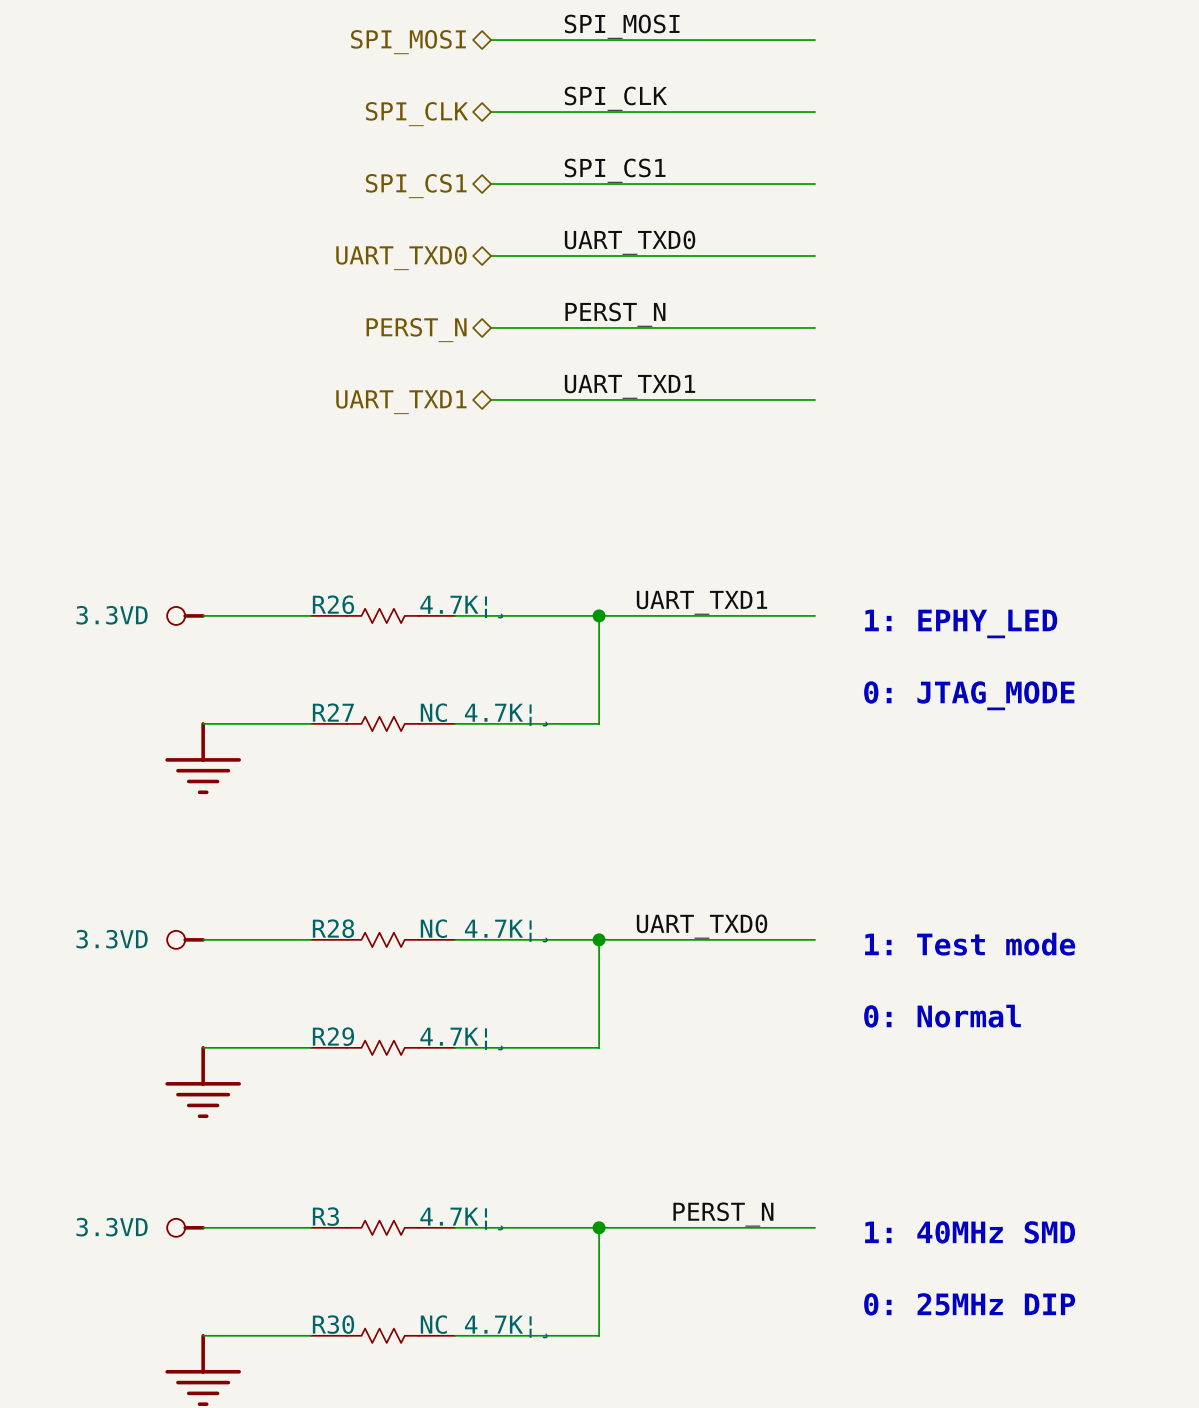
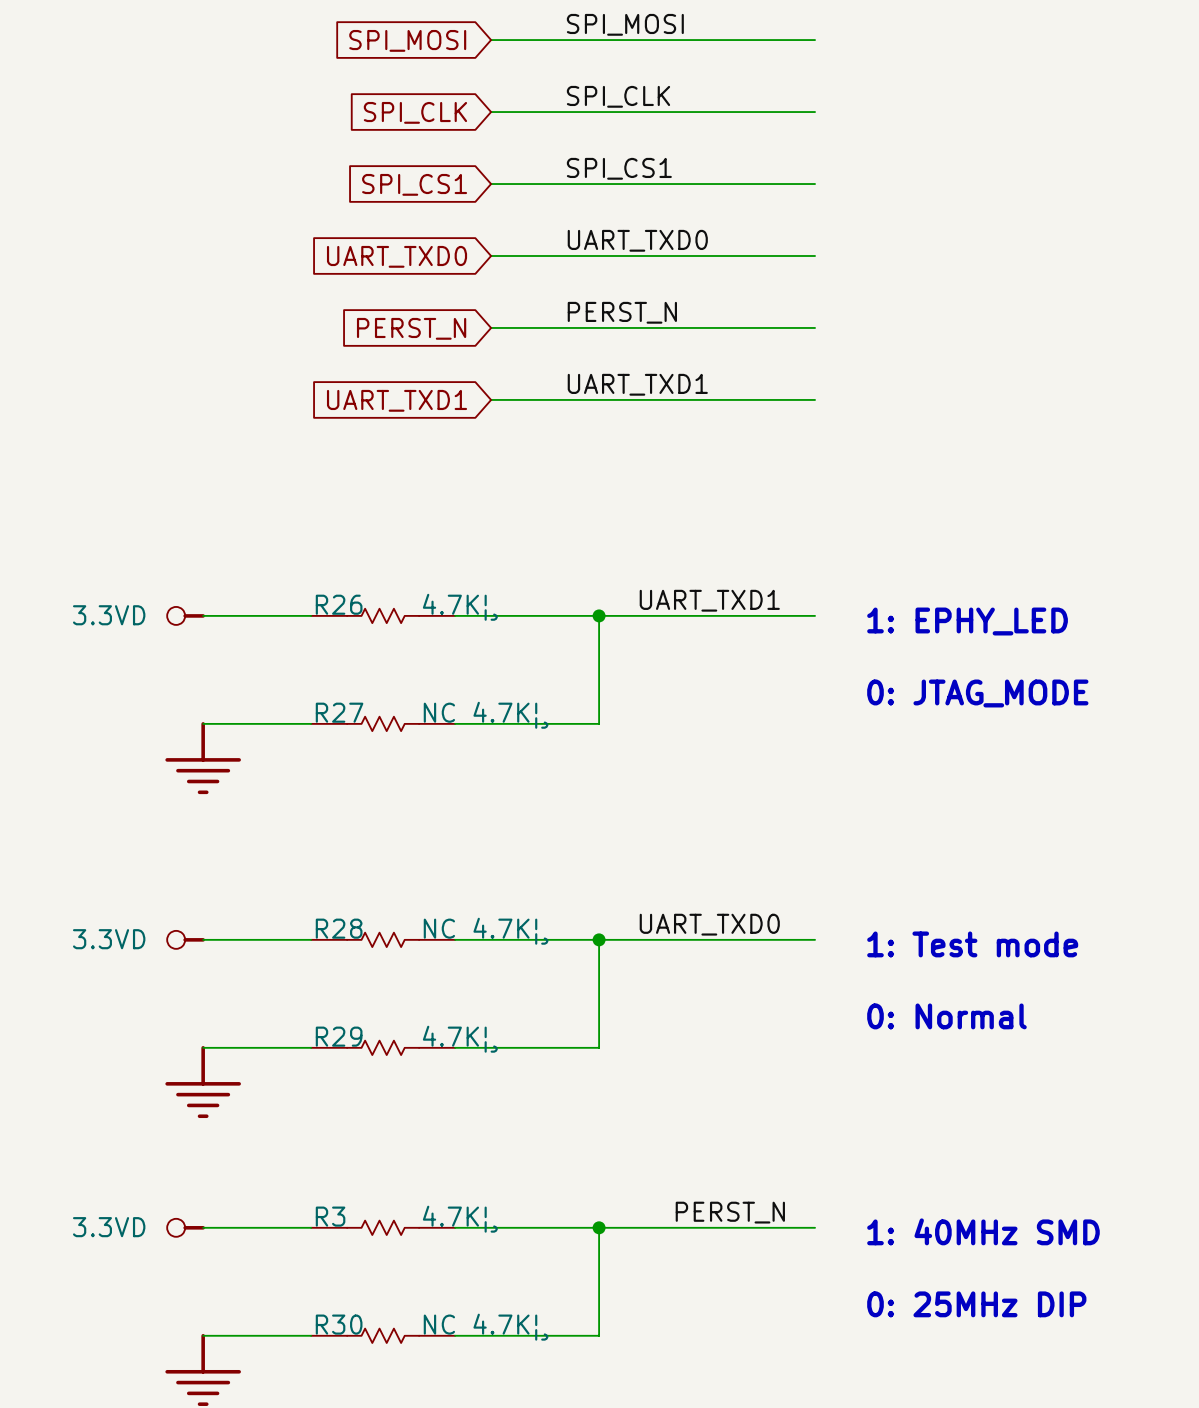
hierarchical label: SPI_MOSI (408, 42) -> none
global label: none -> SPI_MOSI (407, 40)
hierarchical label: SPI_CLK (417, 114) -> none
global label: none -> SPI_CLK (415, 112)
hierarchical label: SPI_CS1 (416, 186) -> none
global label: none -> SPI_CS1 (414, 184)
hierarchical label: UART_TXD0 (401, 258) -> none
global label: none -> UART_TXD0 (397, 256)
hierarchical label: PERST_N (416, 330) -> none
global label: none -> PERST_N (411, 328)
hierarchical label: UART_TXD1 (401, 402) -> none
global label: none -> UART_TXD1 (397, 400)

